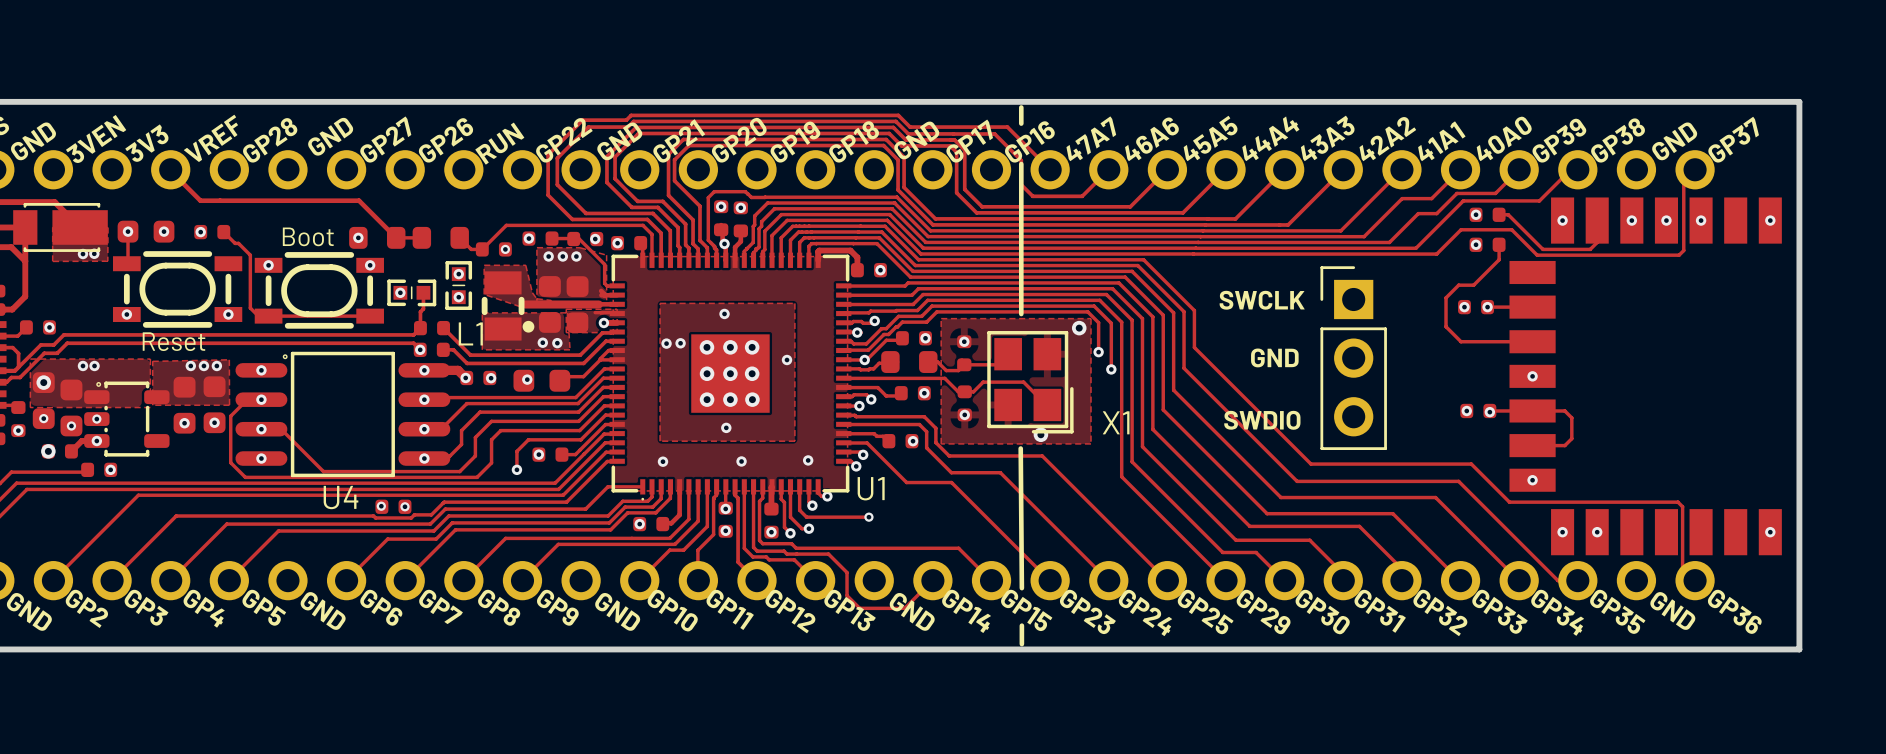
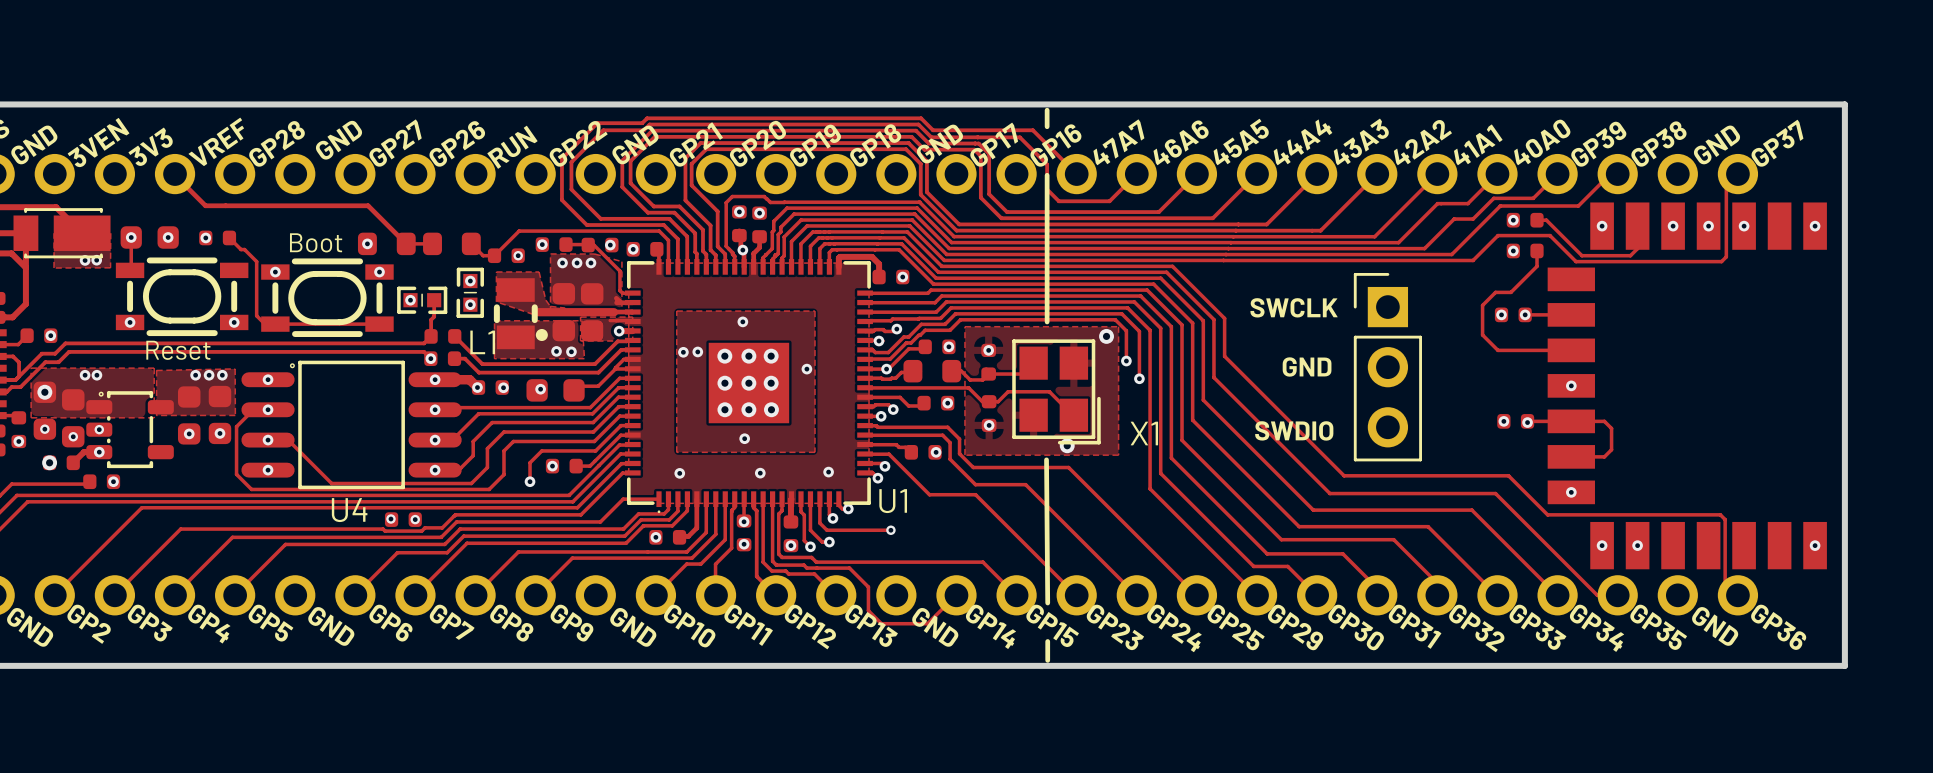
line: (1021, 164) (1021, 170) -> none

